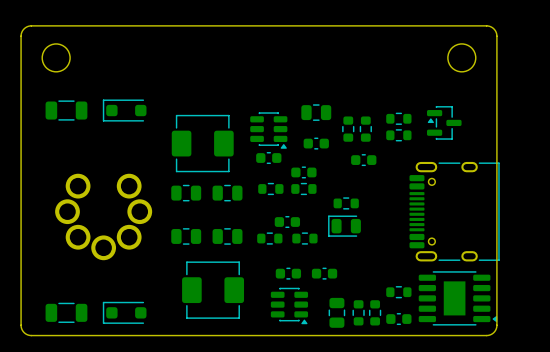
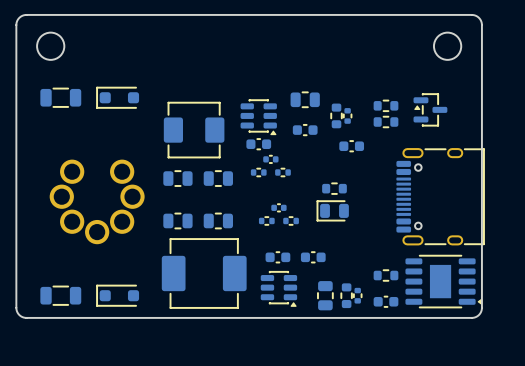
part footprint: [359, 116, 372, 142] -> [343, 108, 353, 124]
part: (303, 172) -> none
part: none -> (270, 159)
part footprint: [258, 182, 284, 195] -> [250, 168, 267, 177]
part: none -> (282, 172)
part: (303, 188) -> none
part footprint: [274, 216, 301, 228] -> [271, 203, 287, 213]
part footprint: [257, 232, 283, 245] -> [258, 216, 275, 226]
part footprint: [292, 232, 318, 245] -> [283, 216, 299, 226]
part footprint: [182, 261, 245, 319] -> [161, 238, 247, 309]
part footprint: [369, 300, 382, 326] -> [353, 287, 363, 304]

